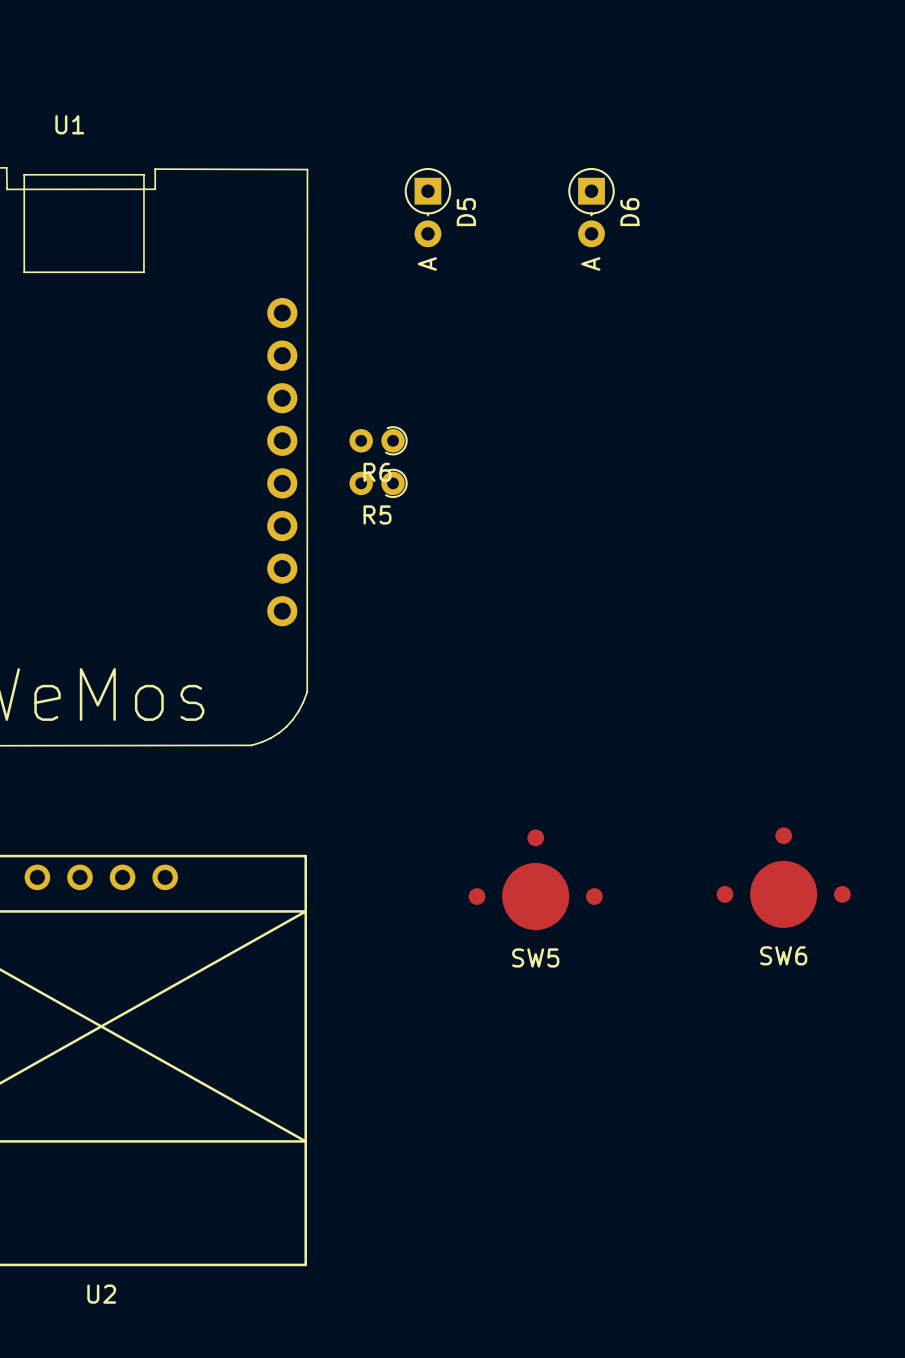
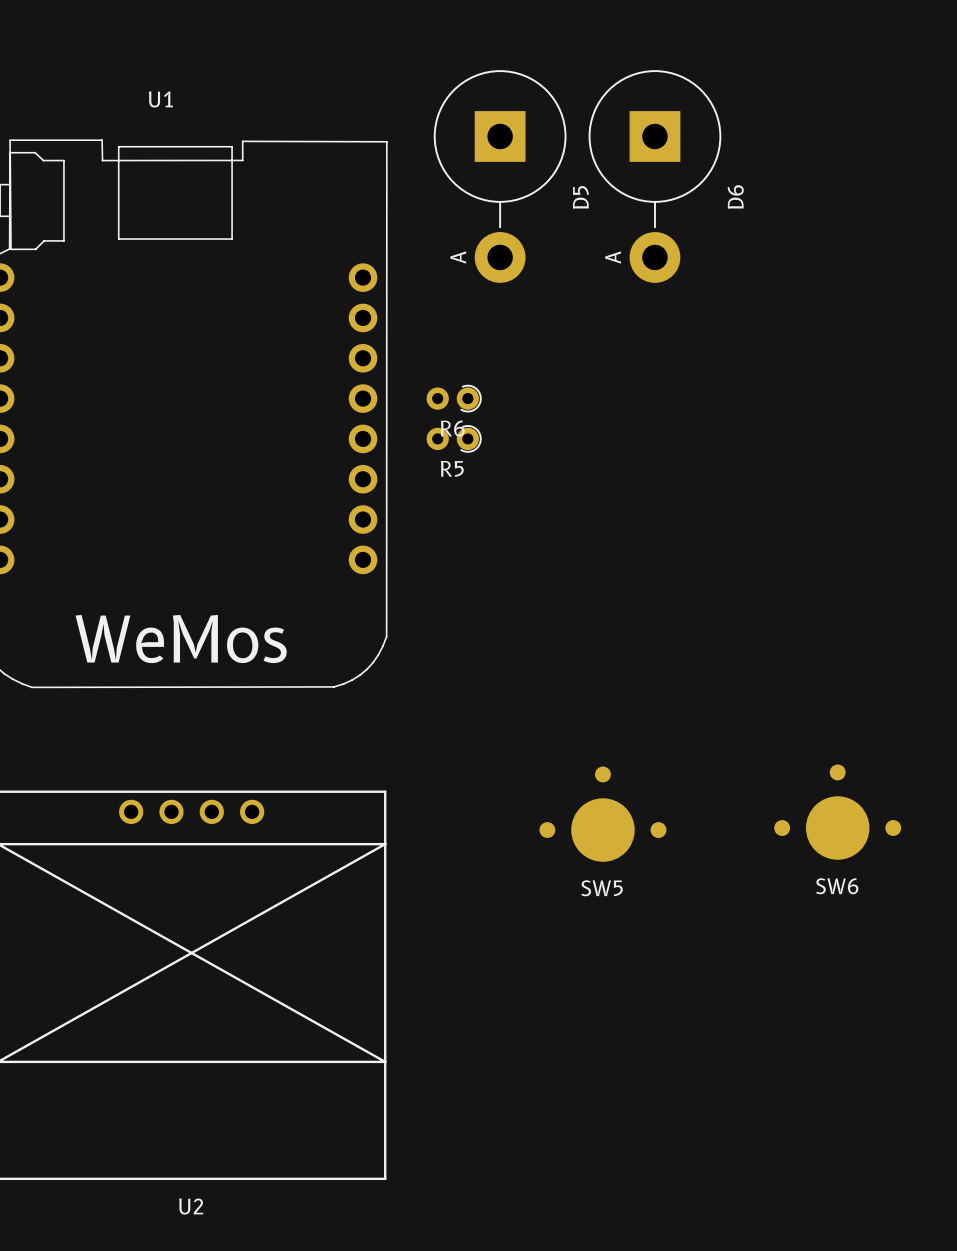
D5 footprint: [404, 167, 452, 248] -> [433, 70, 567, 283]
D6 footprint: [568, 167, 615, 248] -> [588, 70, 722, 283]
D5 name position: D5 (466, 212) -> D5 (580, 197)
D6 name position: D6 (629, 212) -> D6 (735, 196)

